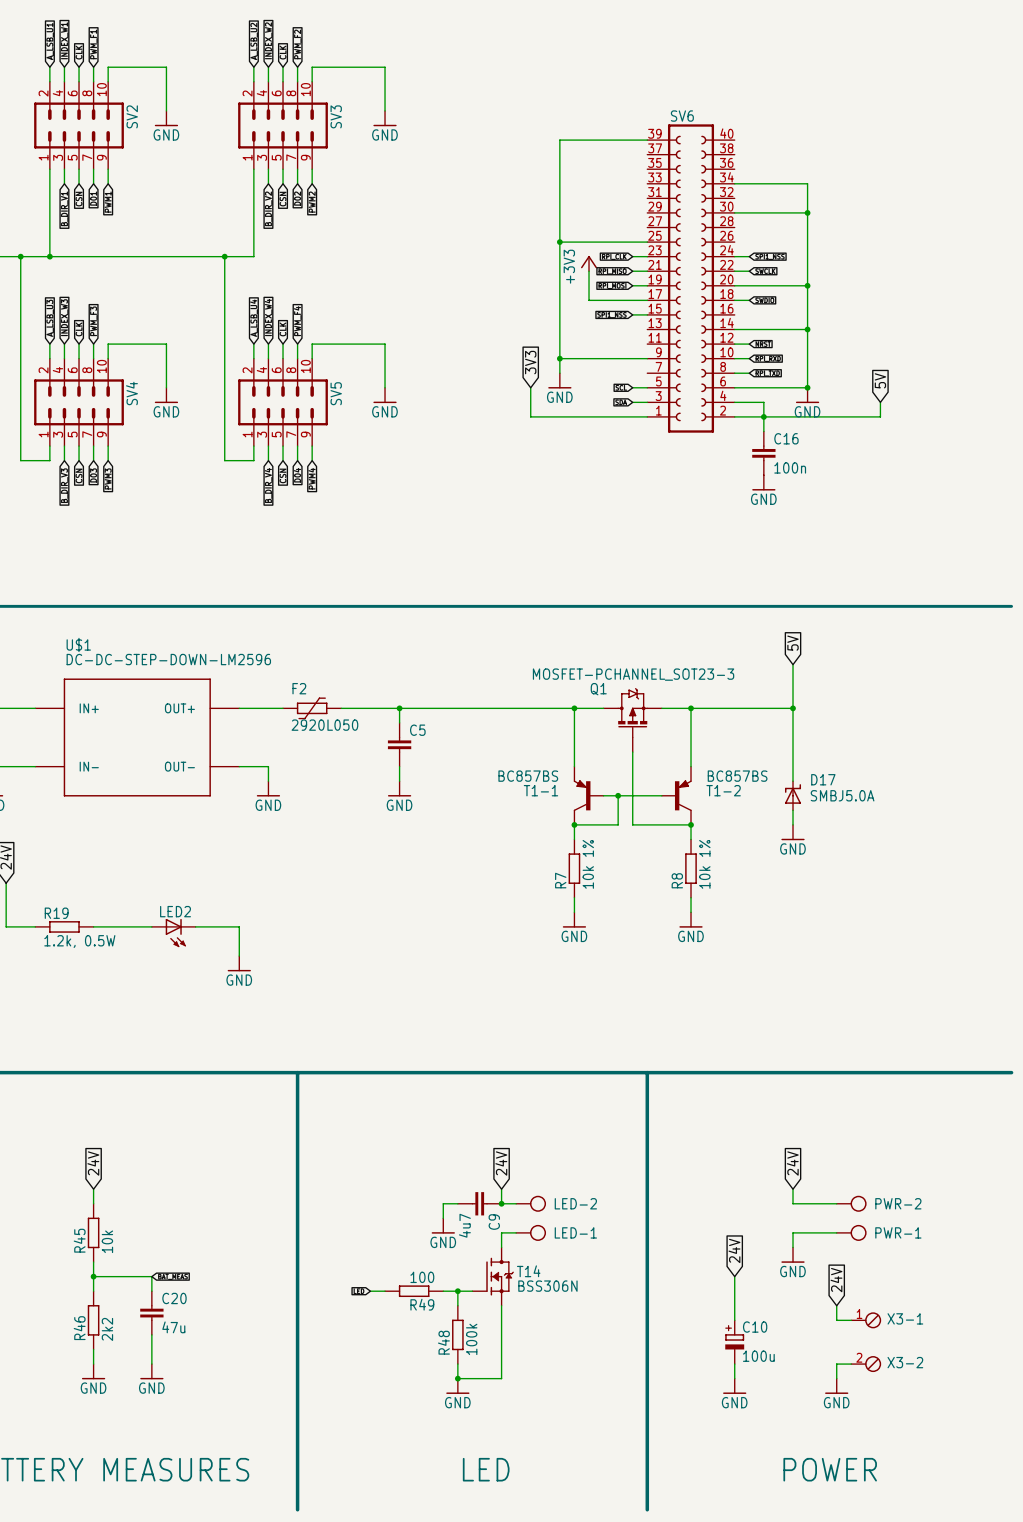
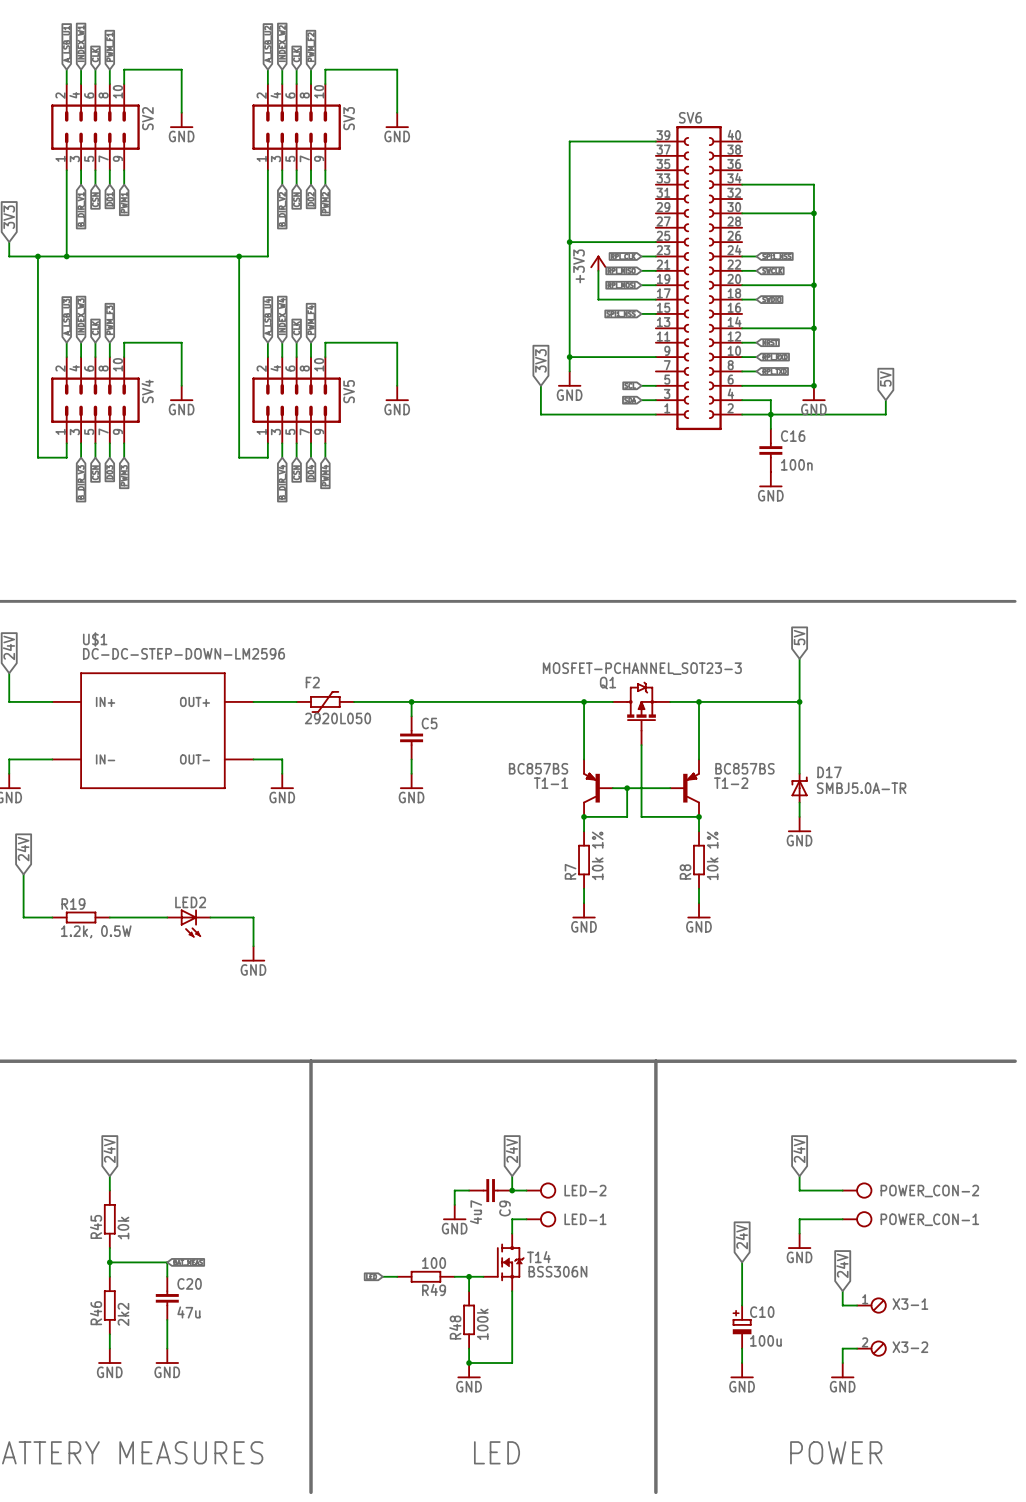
D17 value: SMBJ5.0A (842, 795) -> SMBJ5.0A-TR (861, 788)
PWR-2 name: PWR-2 (898, 1203) -> POWER_CON-2 (929, 1191)
PWR-1 name: PWR-1 (898, 1232) -> POWER_CON-1 (929, 1219)

